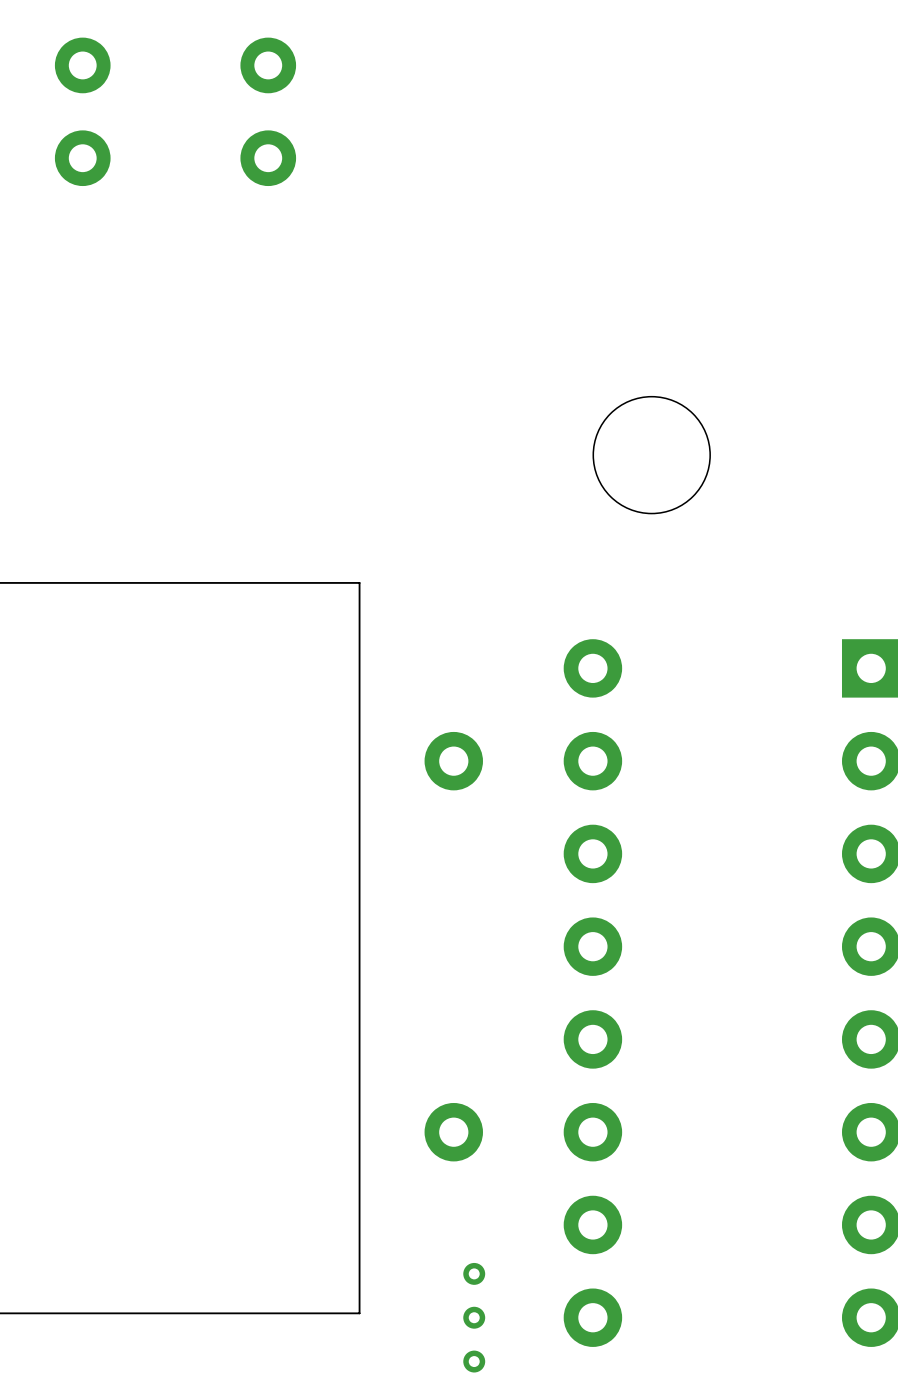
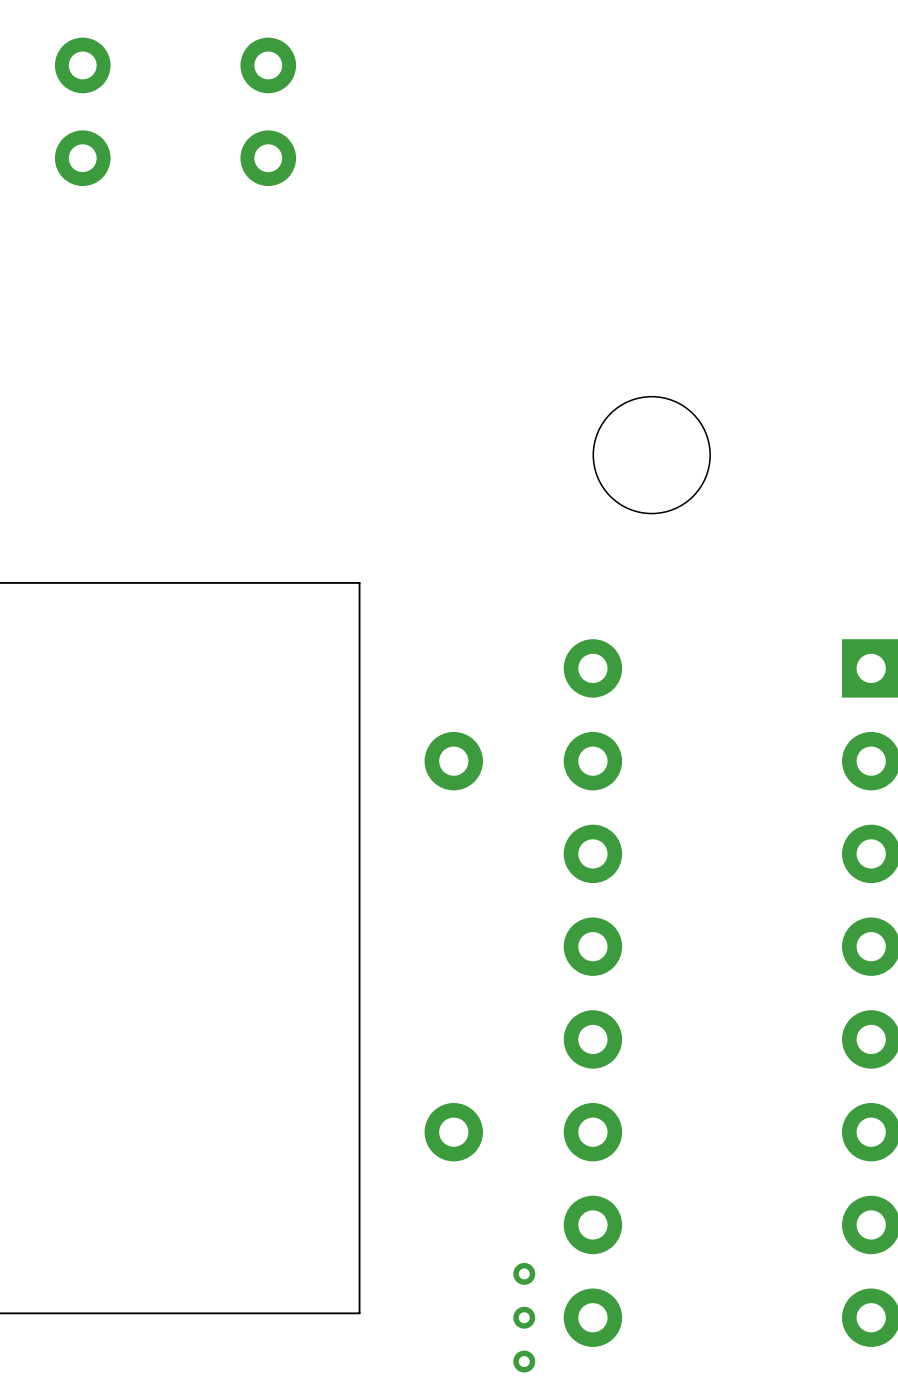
part position: (474, 1317) -> (524, 1317)

